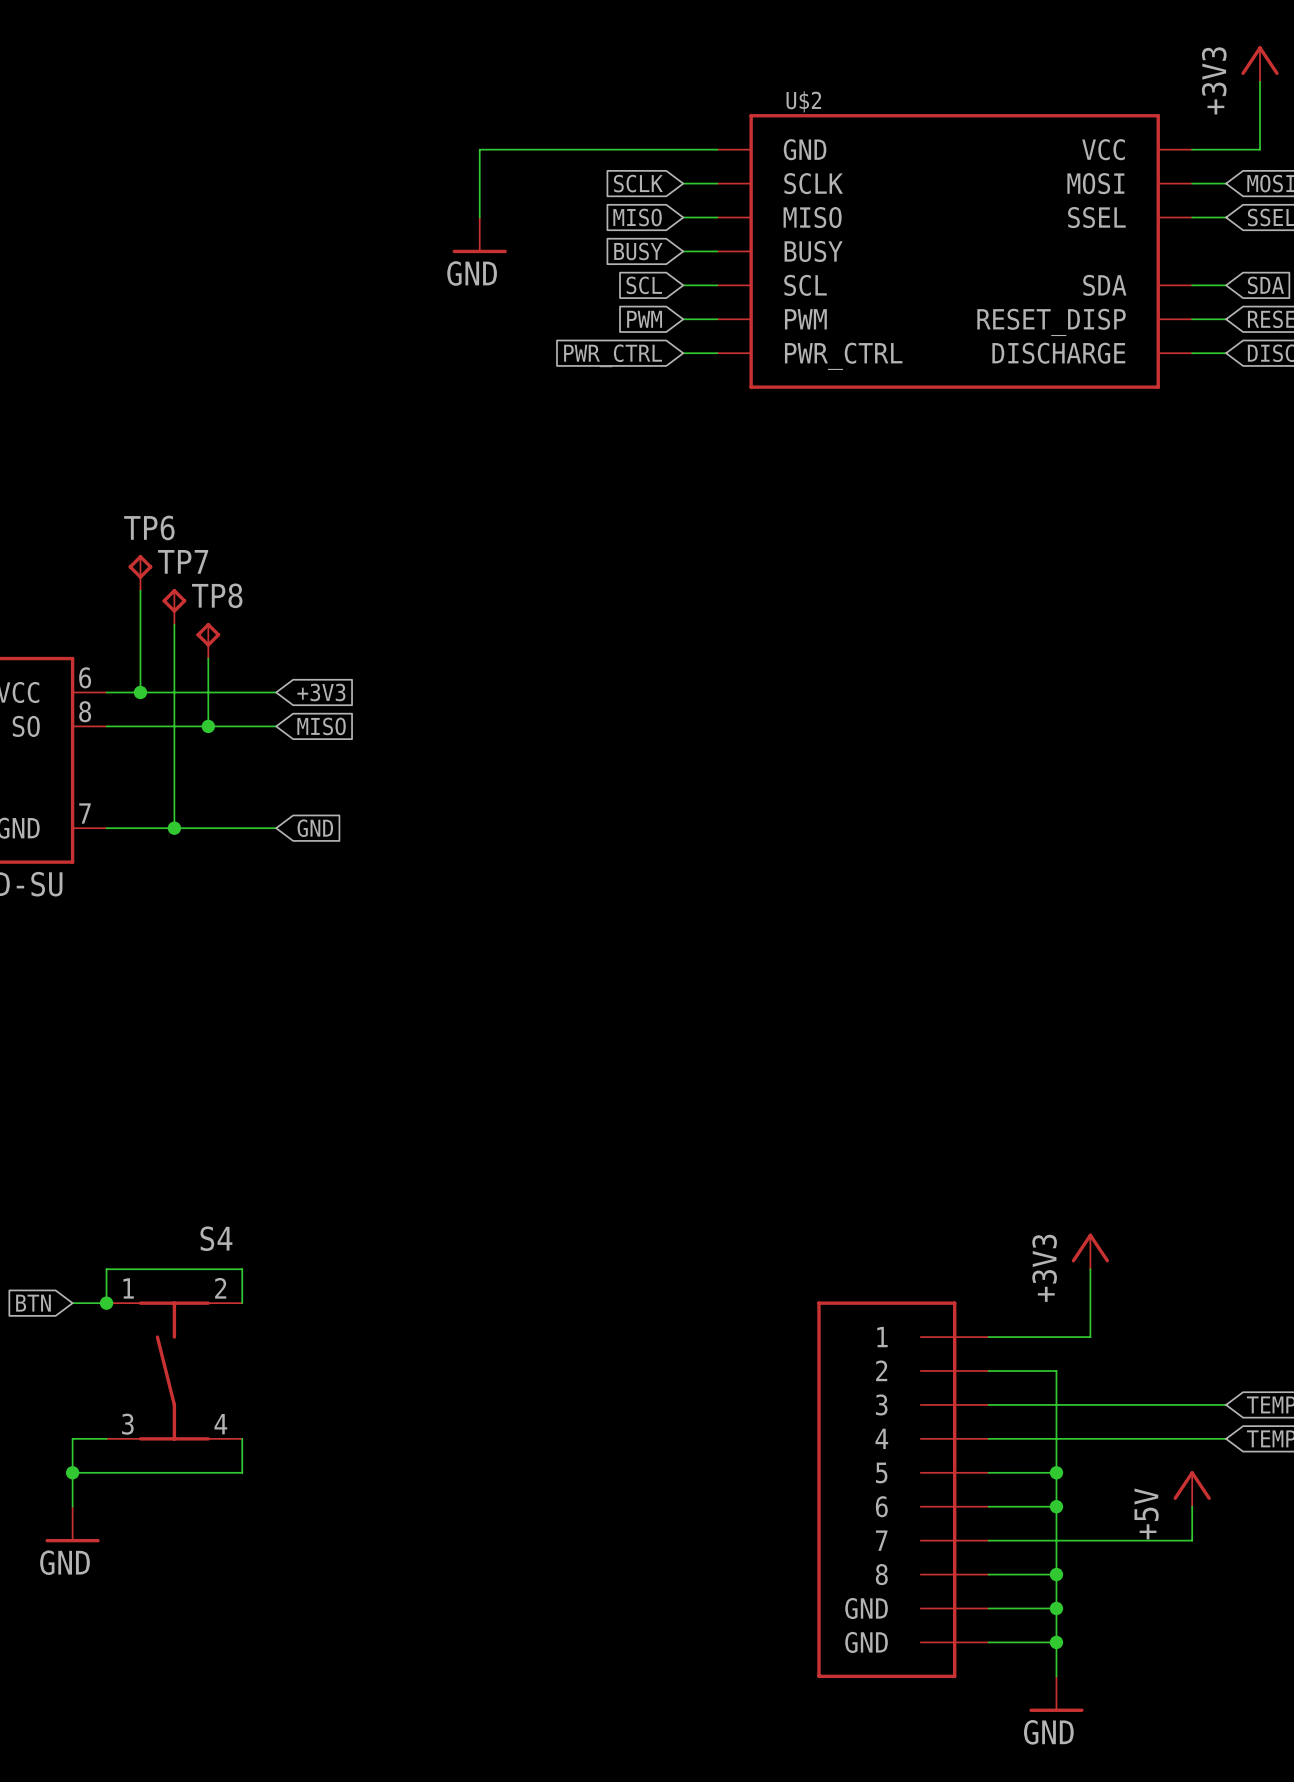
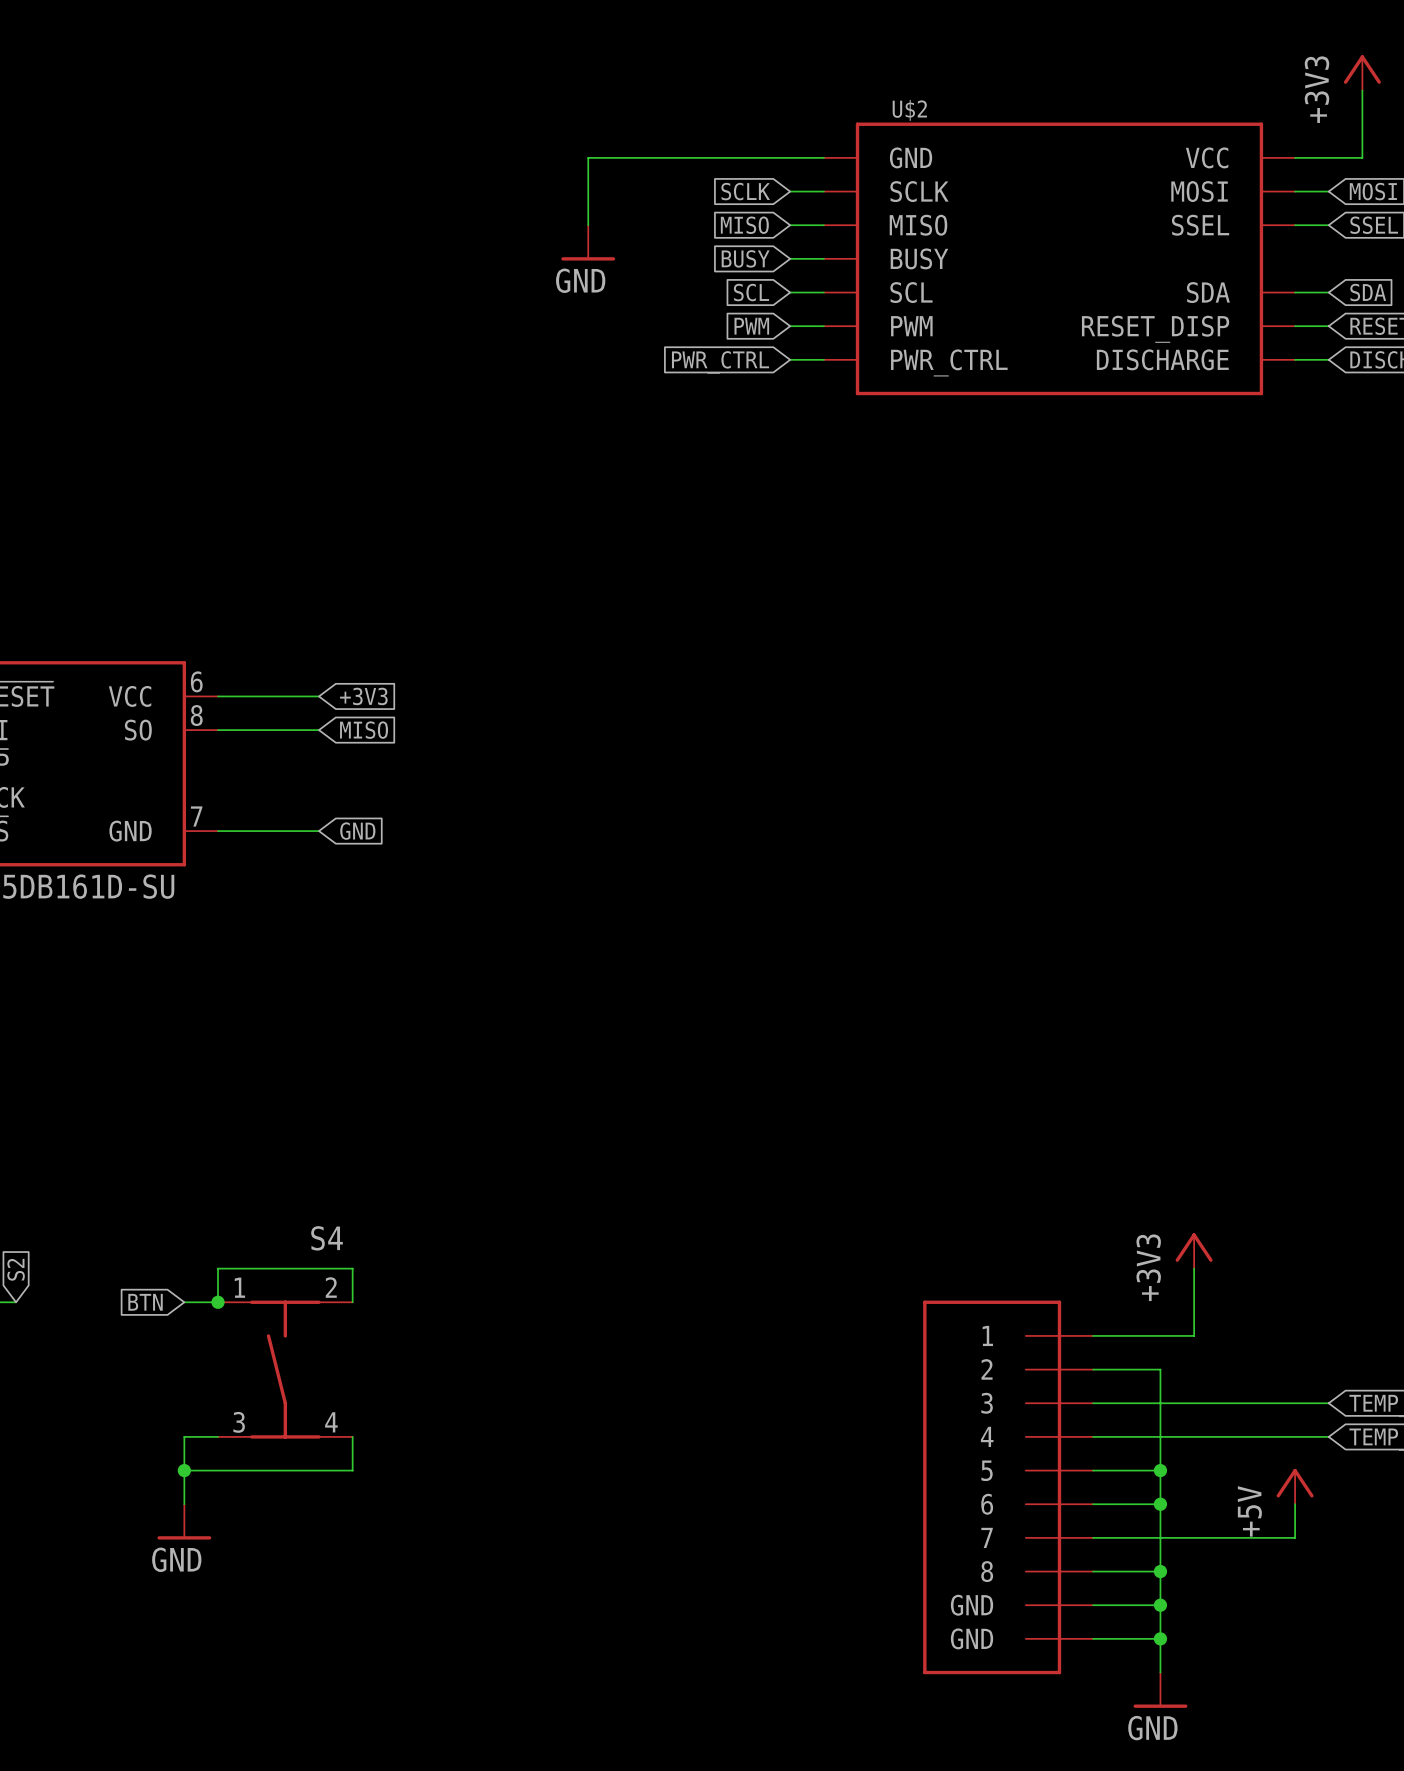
TP6: (140, 572) -> none
wire: (140, 590) (140, 692) -> none
TP7: (174, 606) -> none
wire: (174, 624) (174, 828) -> none
TP8: (208, 640) -> none
wire: (208, 658) (208, 726) (276, 726) -> none
junction: (140, 692) -> none
wire: (208, 692) (276, 692) -> none
global label position: +3V3 (321, 692) -> +3V3 (363, 696)
junction: (208, 726) -> none
global label position: MISO (321, 726) -> MISO (364, 730)
junction: (174, 828) -> none
wire: (208, 828) (276, 828) -> none
global label position: GND (315, 828) -> GND (357, 831)

